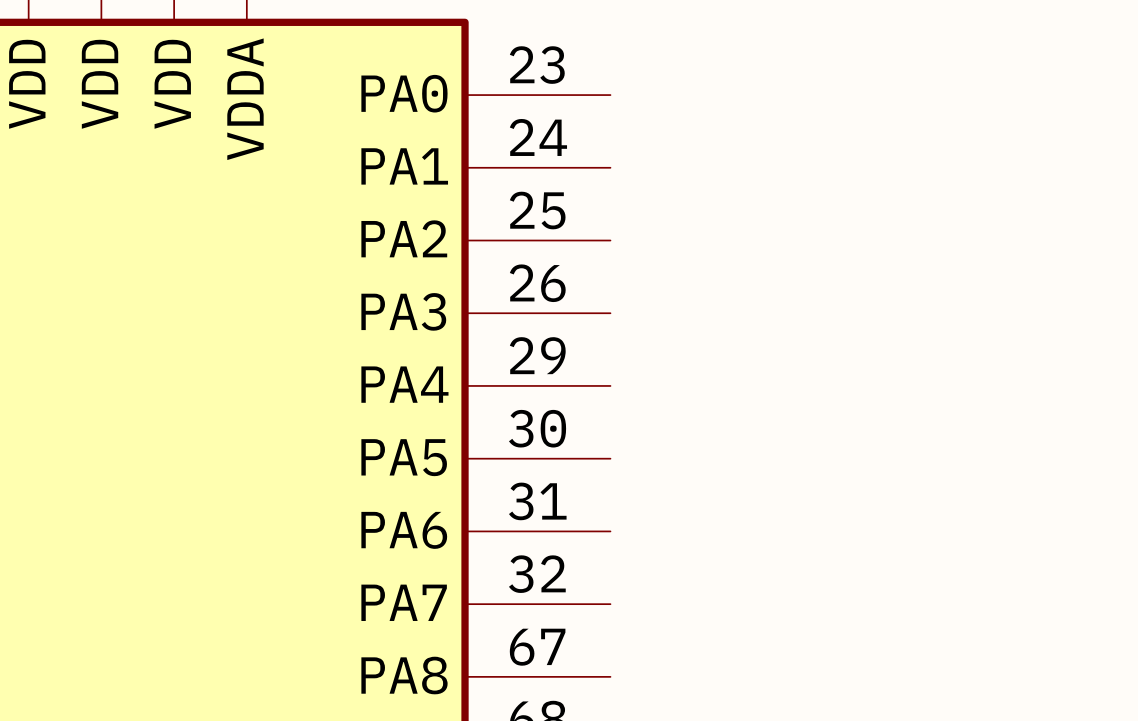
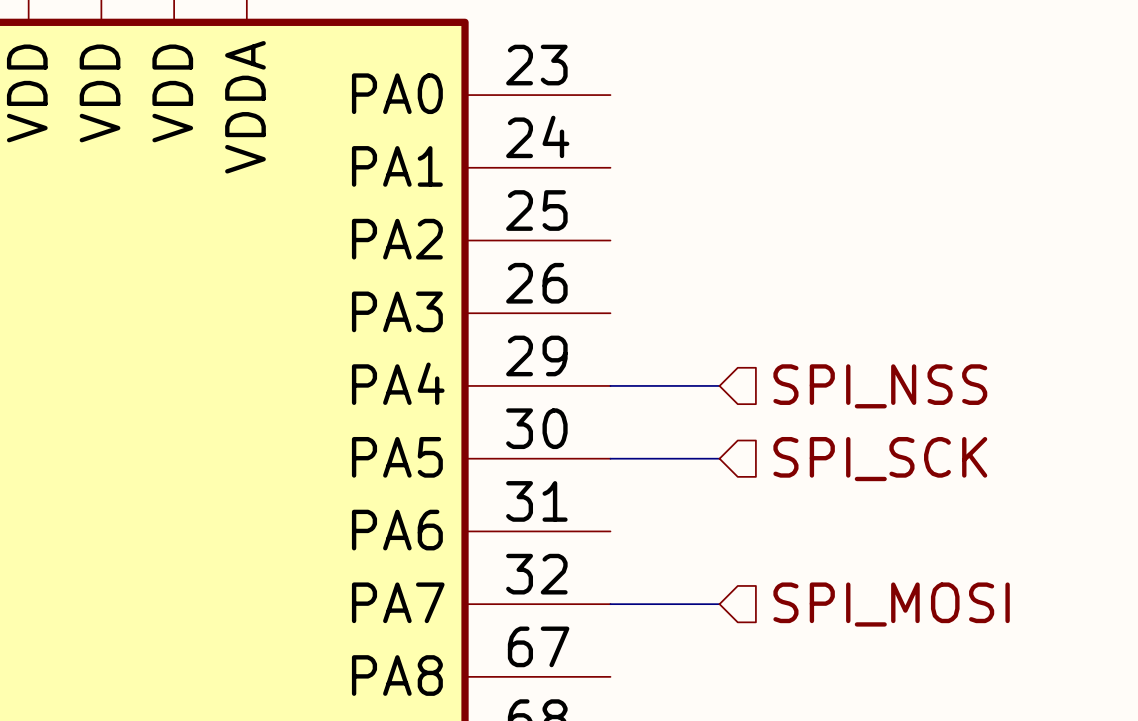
wire: none -> (610, 385) (719, 385)
hierarchical label: none -> SPI_NSS (880, 386)
wire: none -> (610, 458) (719, 458)
hierarchical label: none -> SPI_SCK (880, 459)
wire: none -> (610, 604) (719, 604)
hierarchical label: none -> SPI_MOSI (891, 604)

